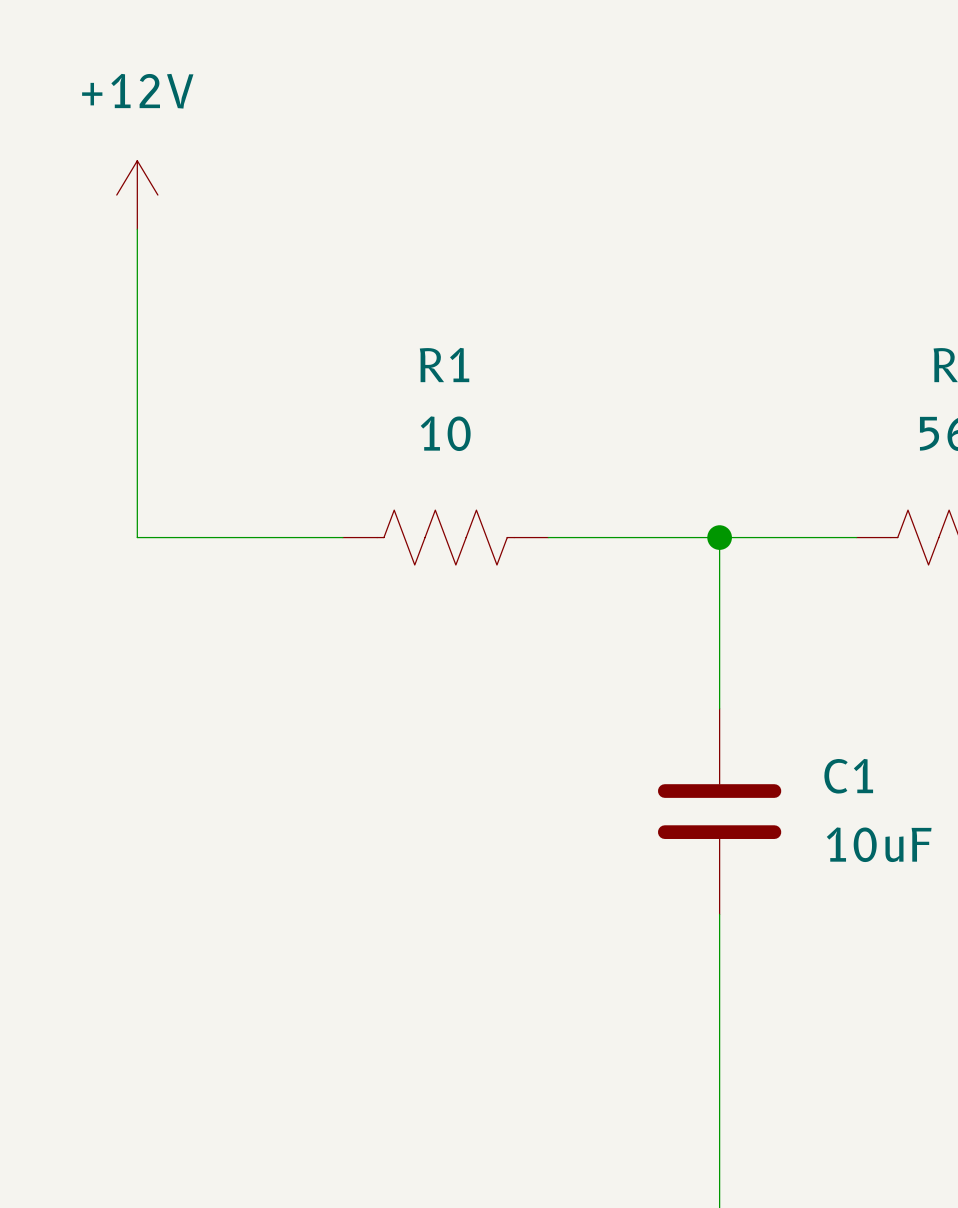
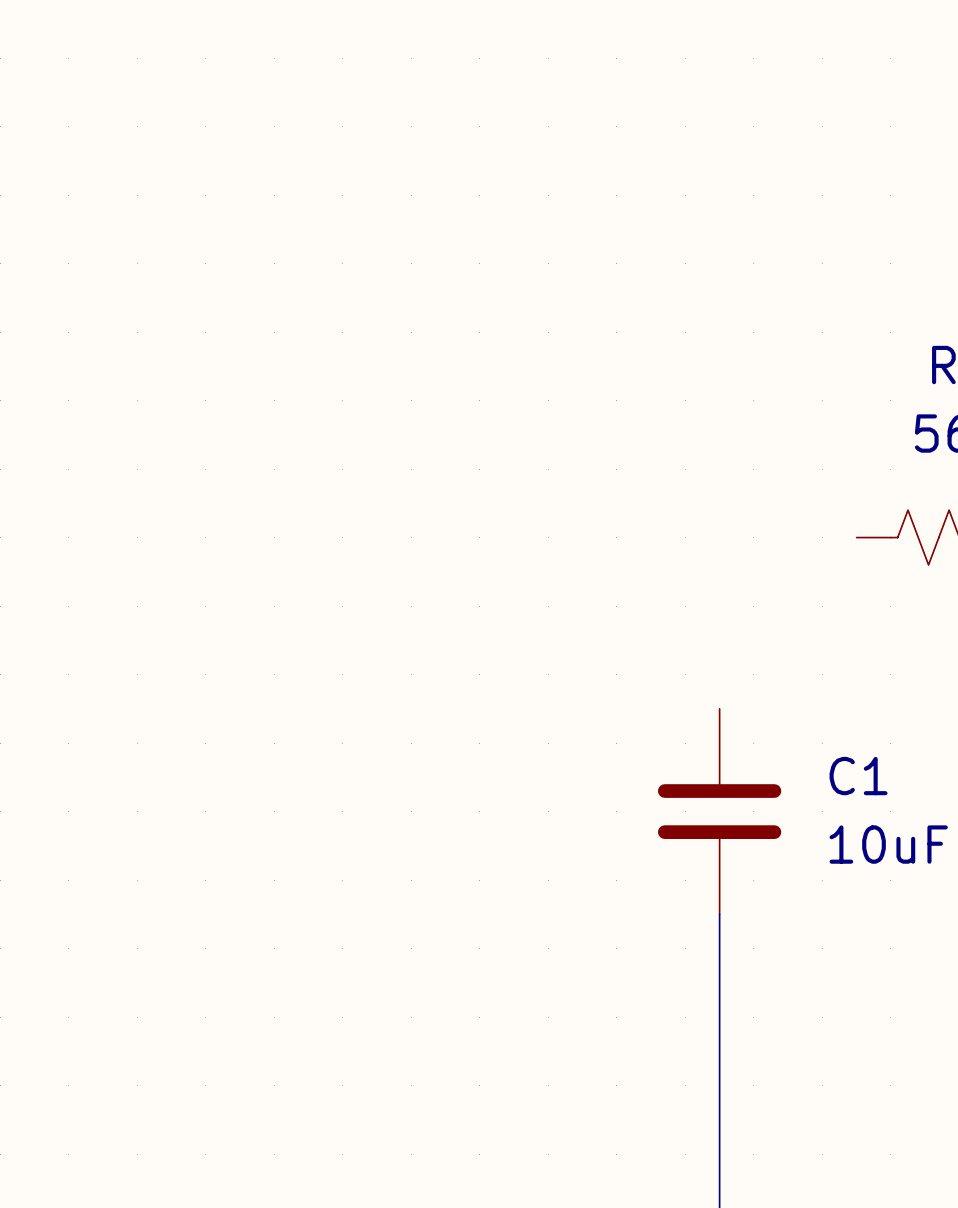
power symbol: +12V (137, 195) -> none
wire: (137, 229) (137, 537) (342, 537) -> none
R1: 10 (445, 537) -> none
wire: (548, 537) (856, 537) -> none
wire: (719, 537) (719, 708) -> none
junction: (719, 537) -> none

